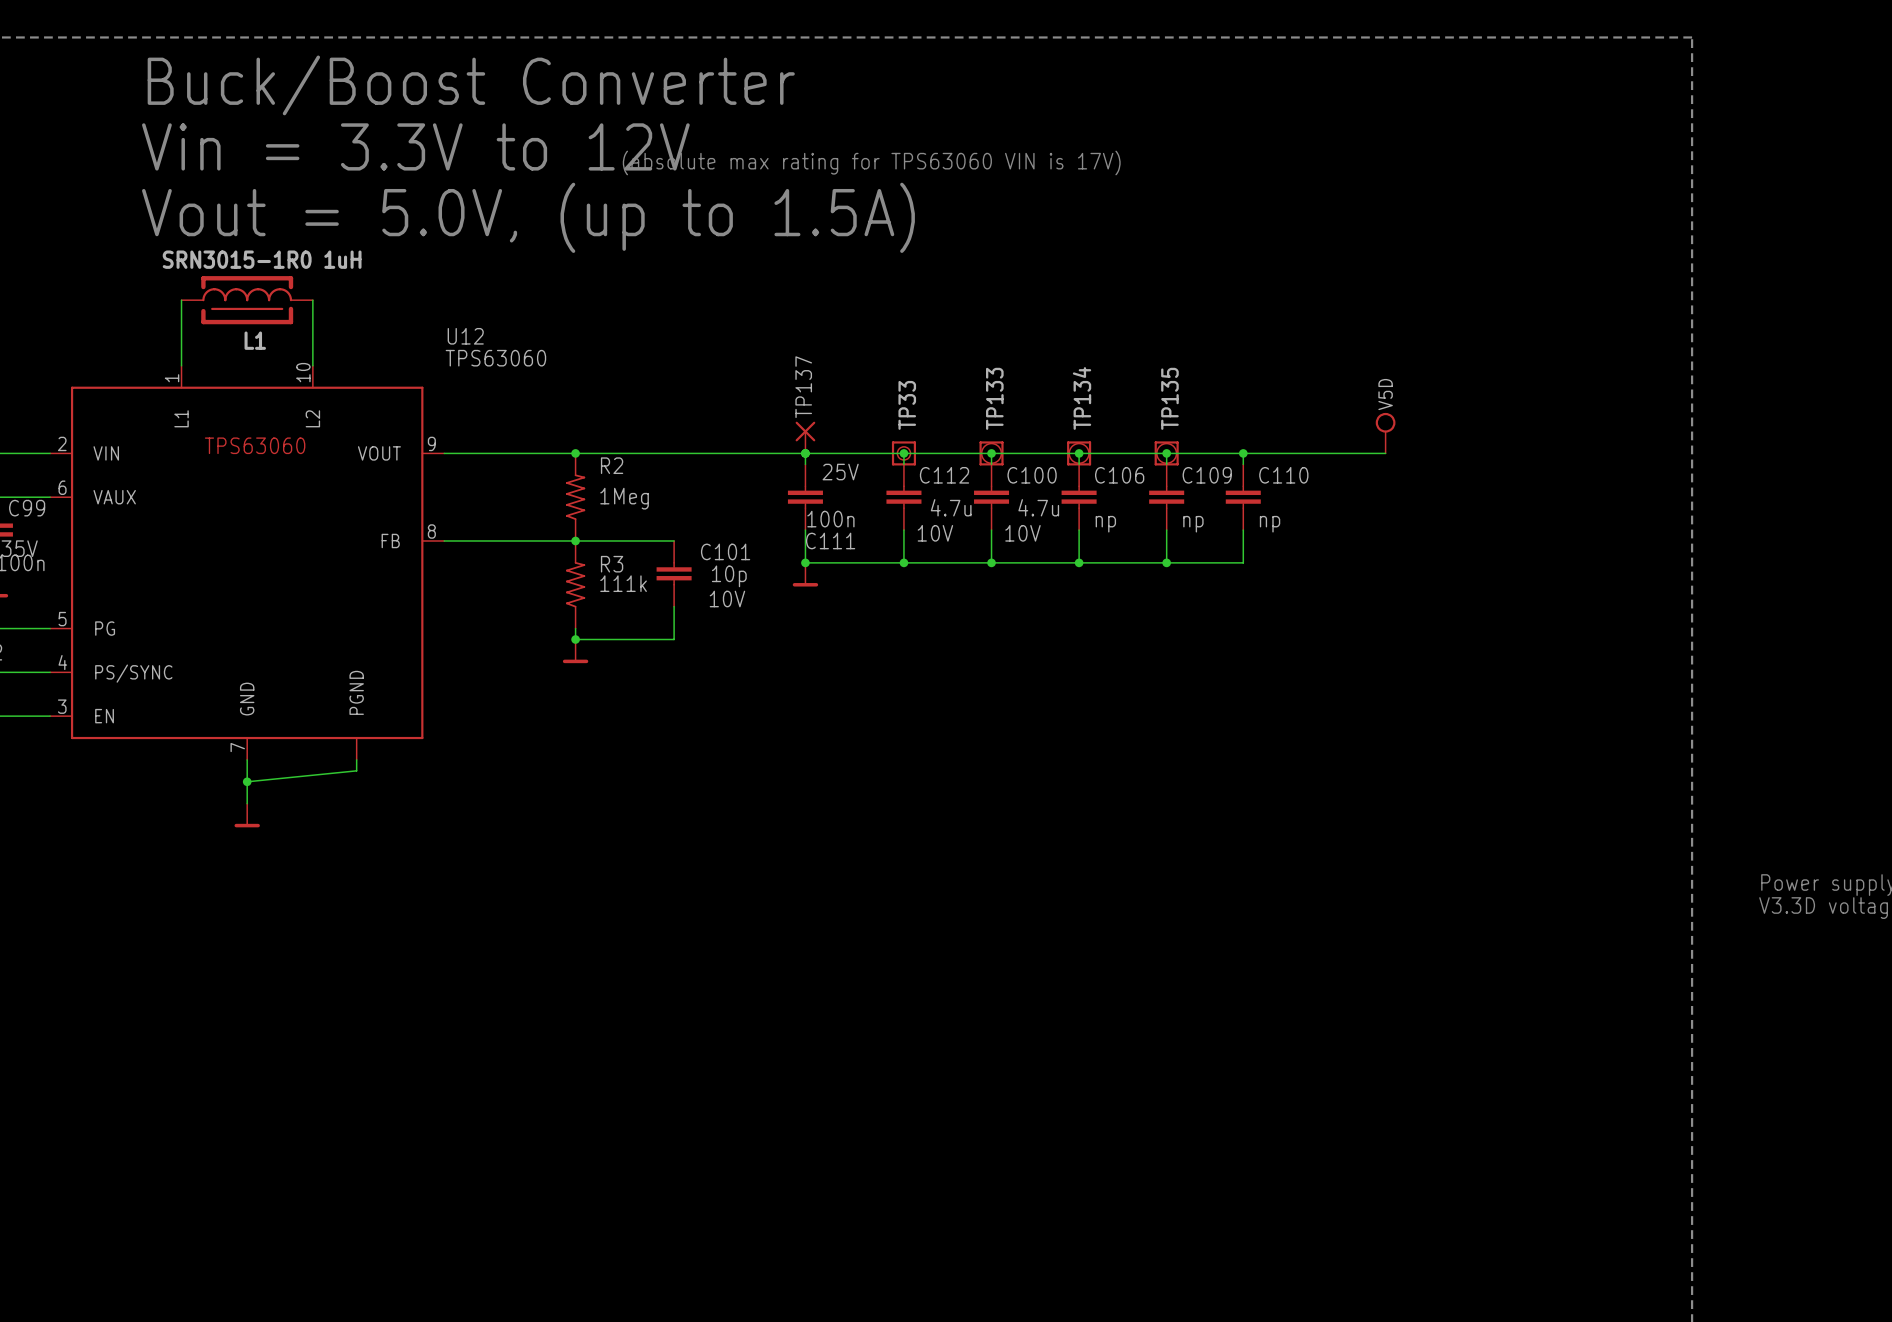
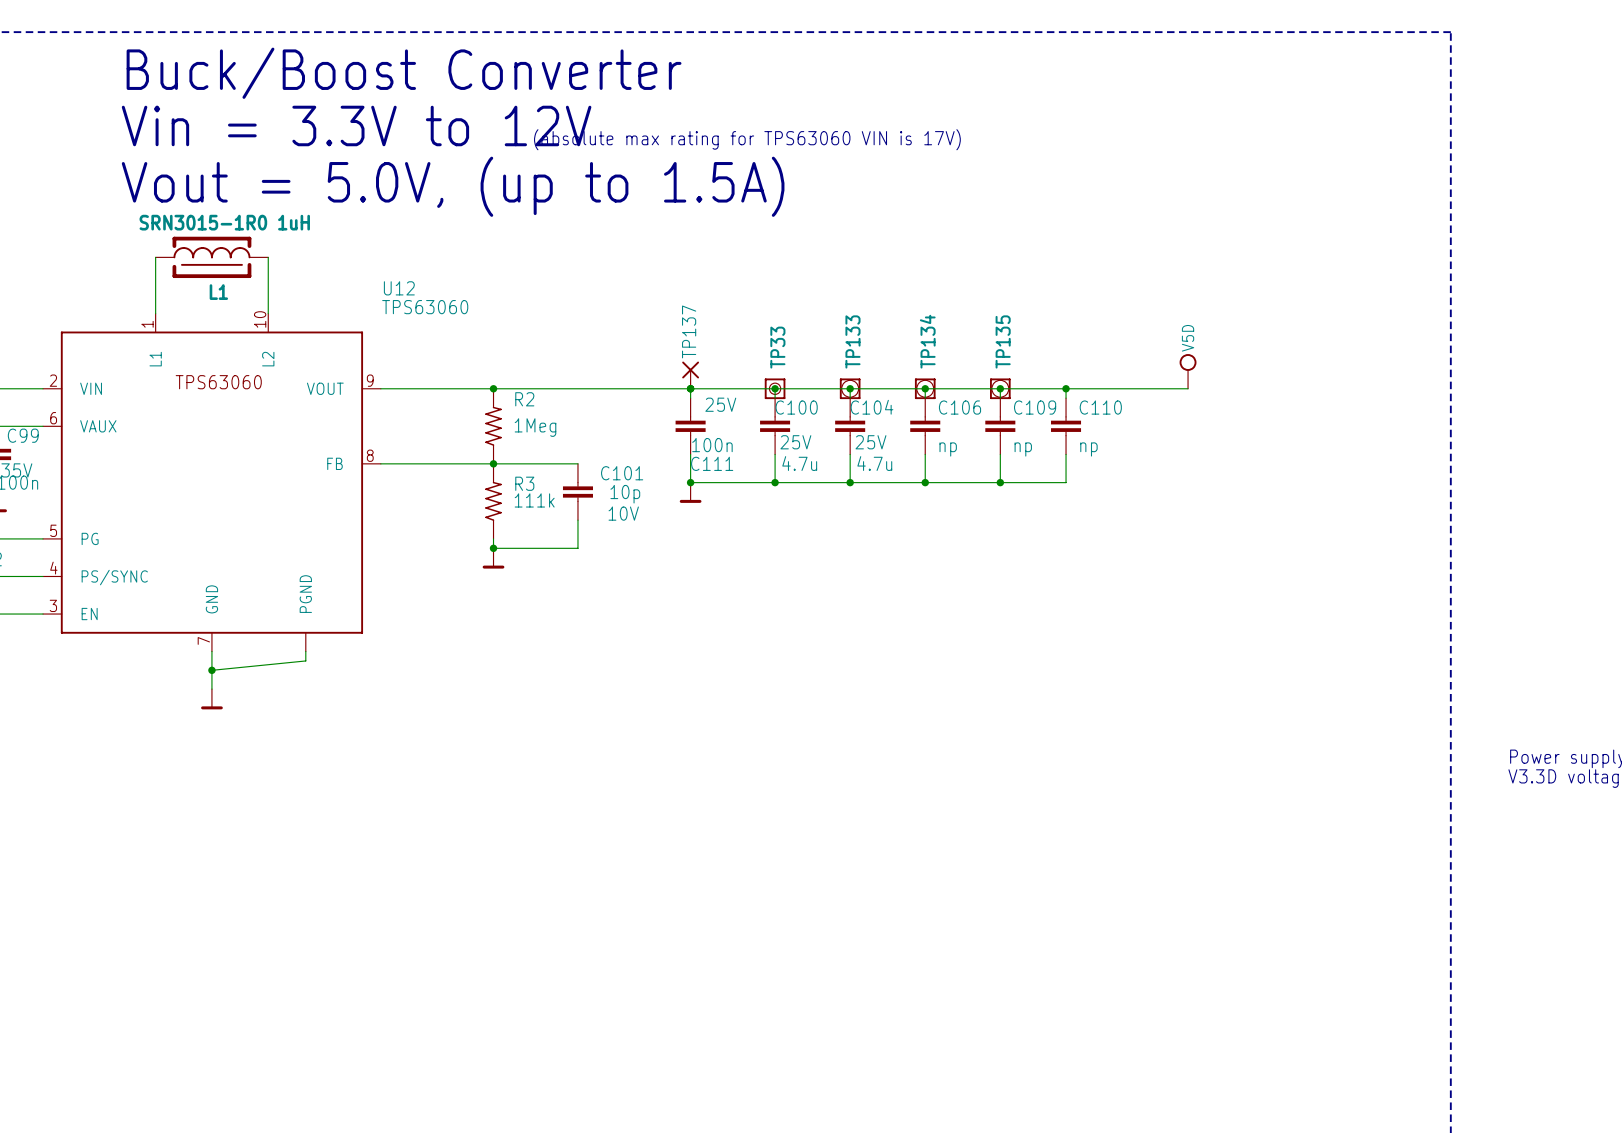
C112 name: C112 (944, 475) -> C100 (796, 407)
C100 name: C100 (1032, 475) -> C104 (871, 407)
C112 value position: 4.7u (951, 507) -> 4.7u (799, 463)
C100 value position: 4.7u (1038, 507) -> 4.7u (874, 463)
C112 text: 10V (935, 533) -> 25V (795, 442)
C100 text: 10V (1022, 533) -> 25V (870, 442)

